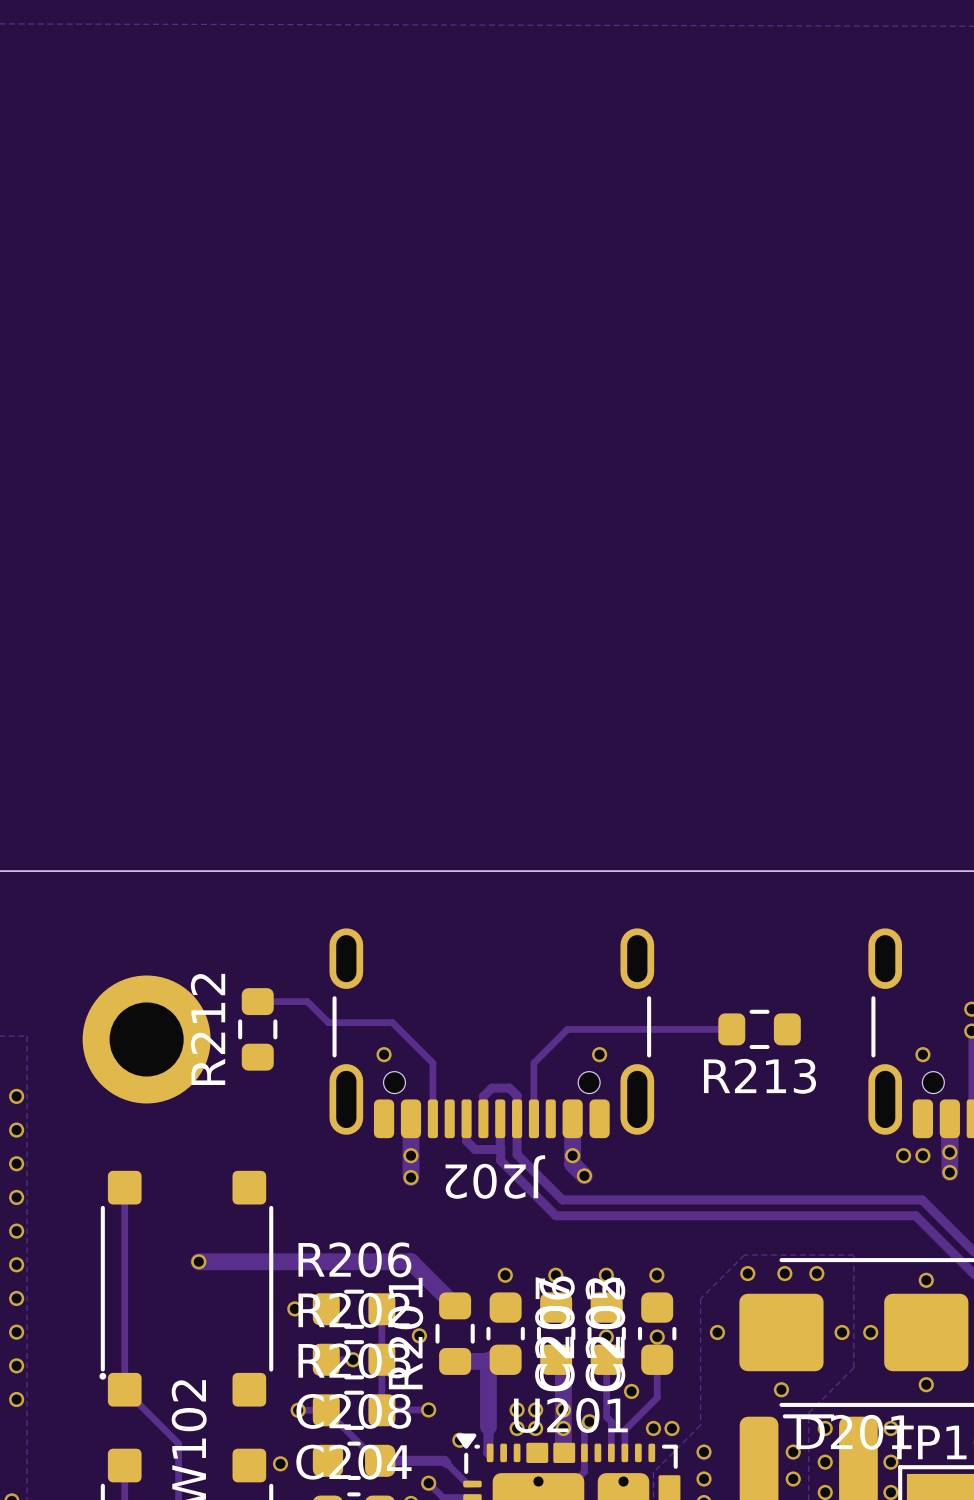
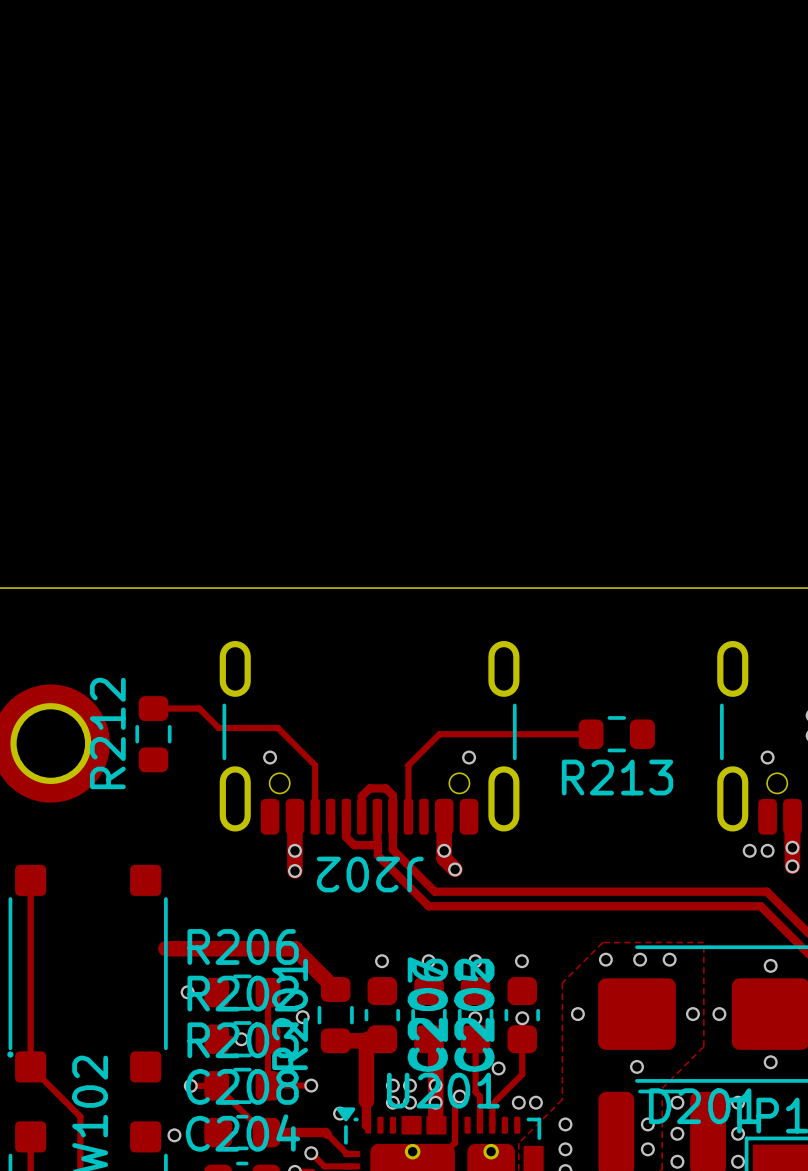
track: (198, 1261) (271, 1261) -> none
via: (198, 1261) -> none

